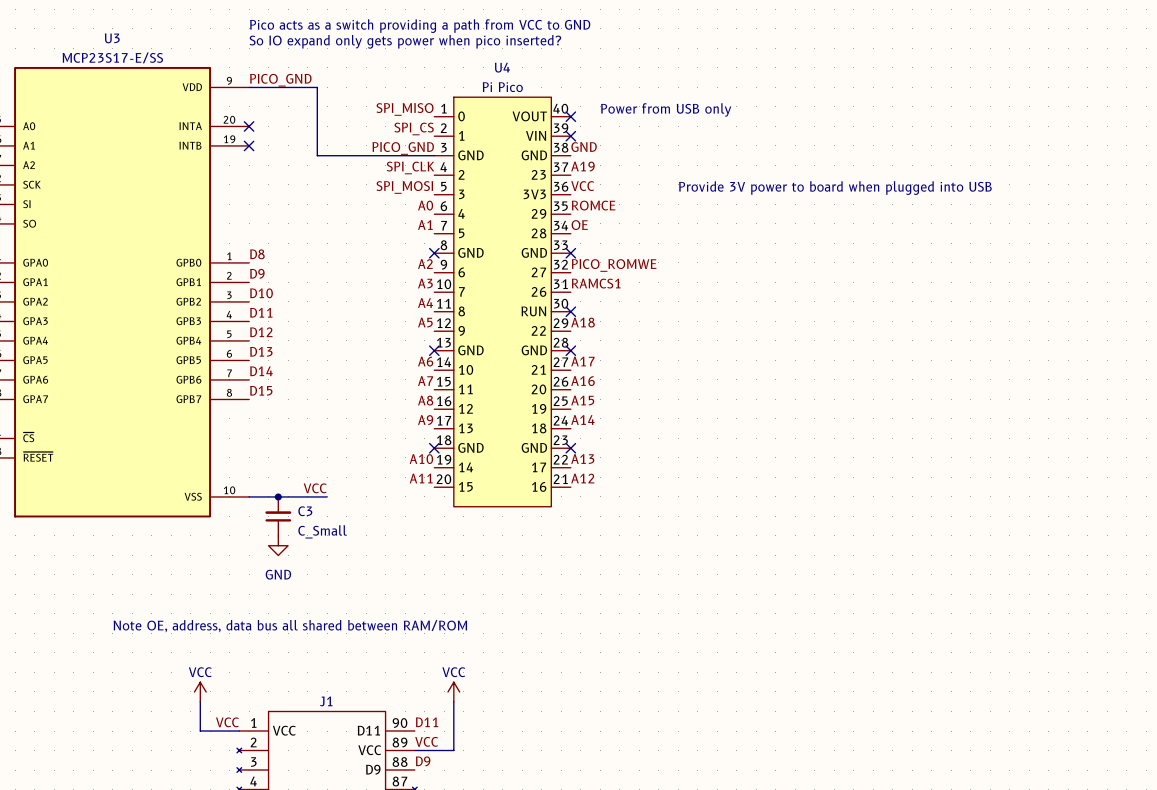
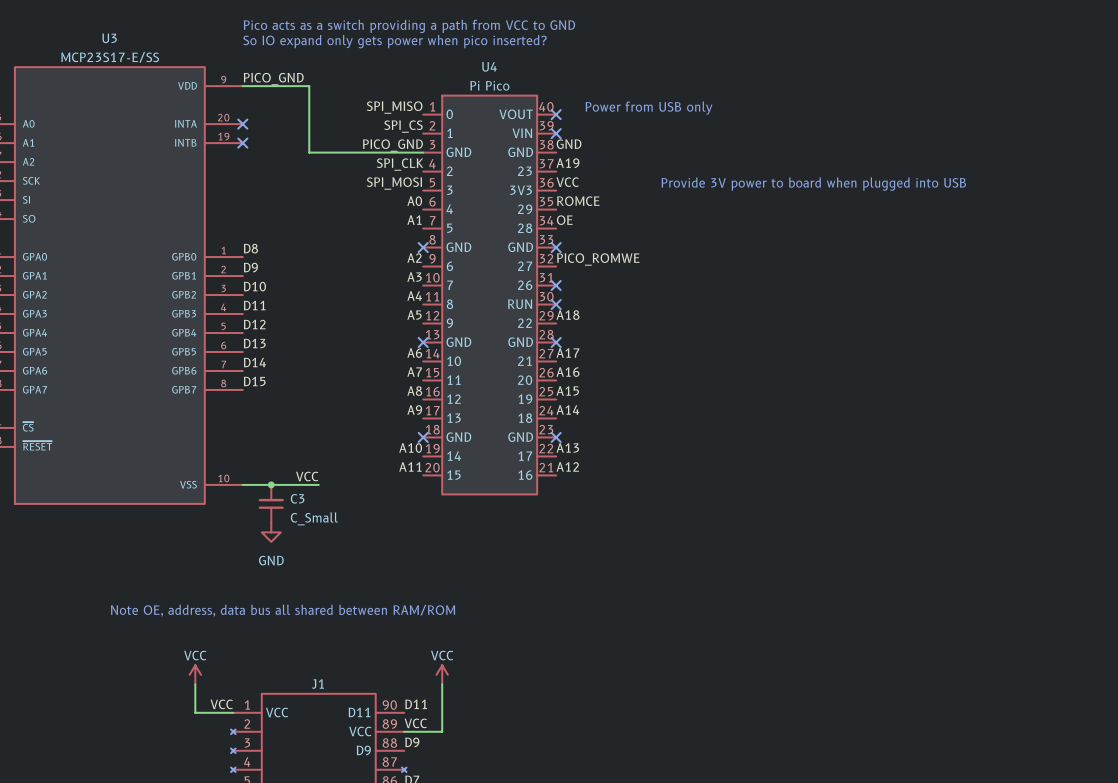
label: RAMCS1 (596, 283) -> none
no-connect mark: none -> (556, 285)

